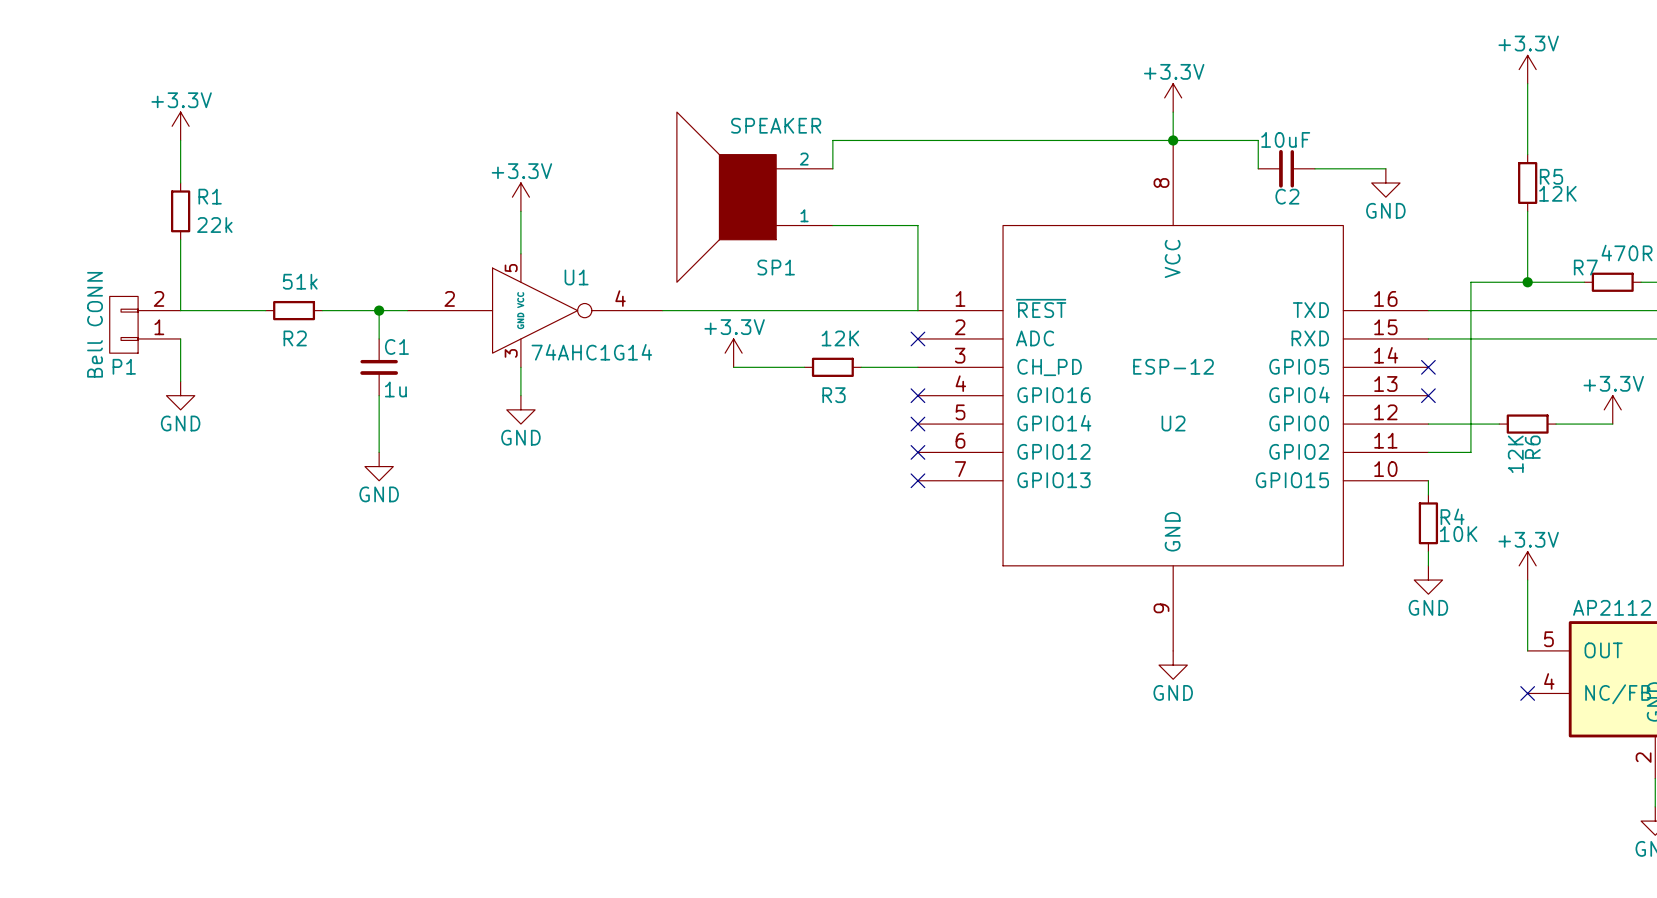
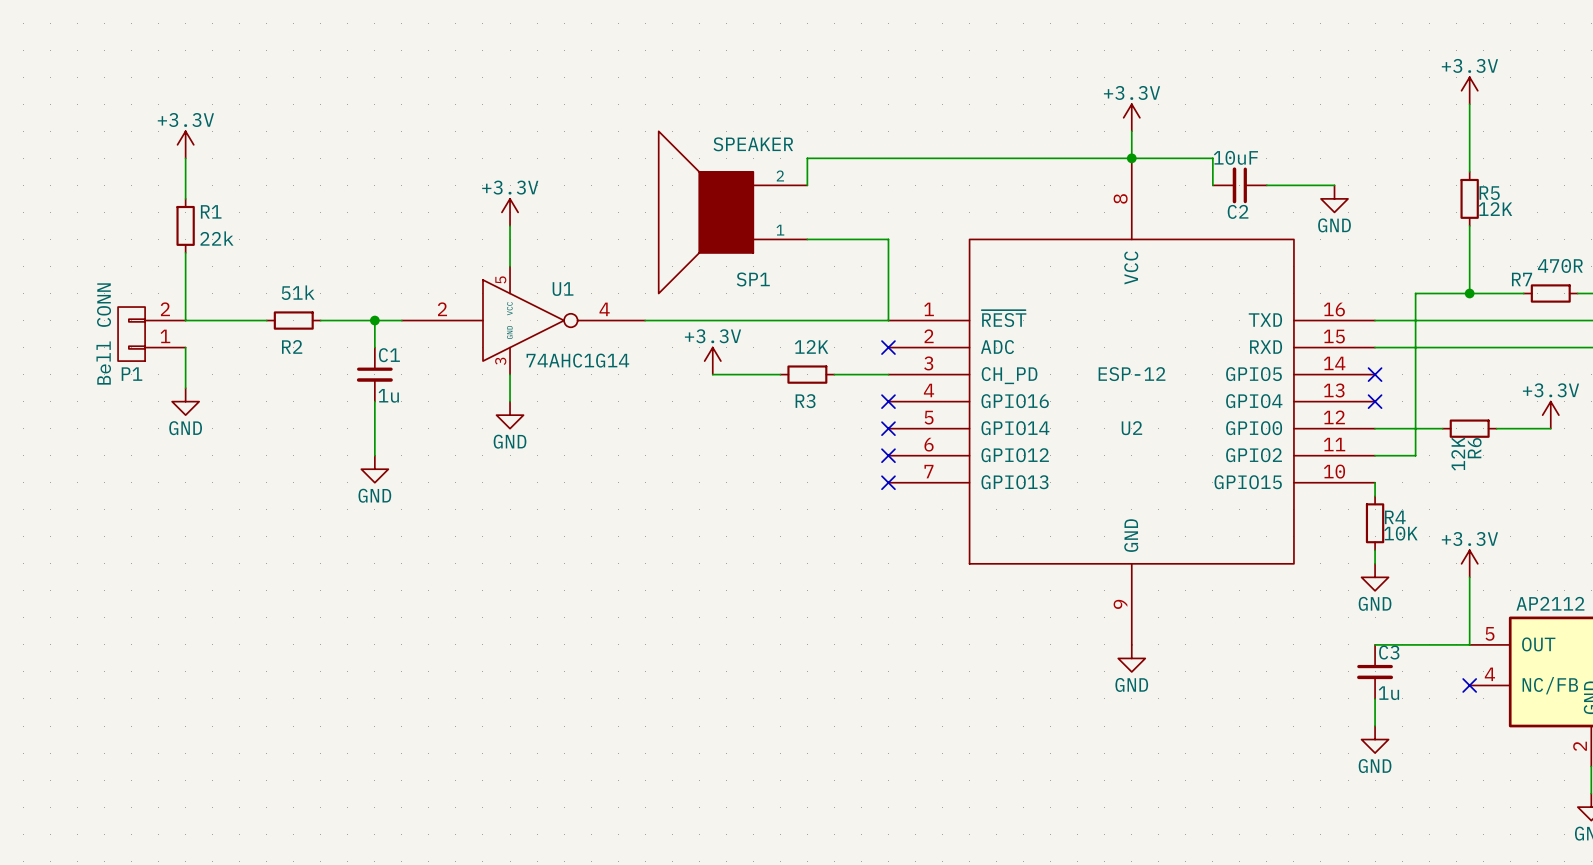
wire: none -> (1375, 644) (1469, 644)
C3: none -> 1u (1375, 671)
wire: none -> (1375, 698) (1375, 726)
power symbol: none -> GND (1375, 739)

